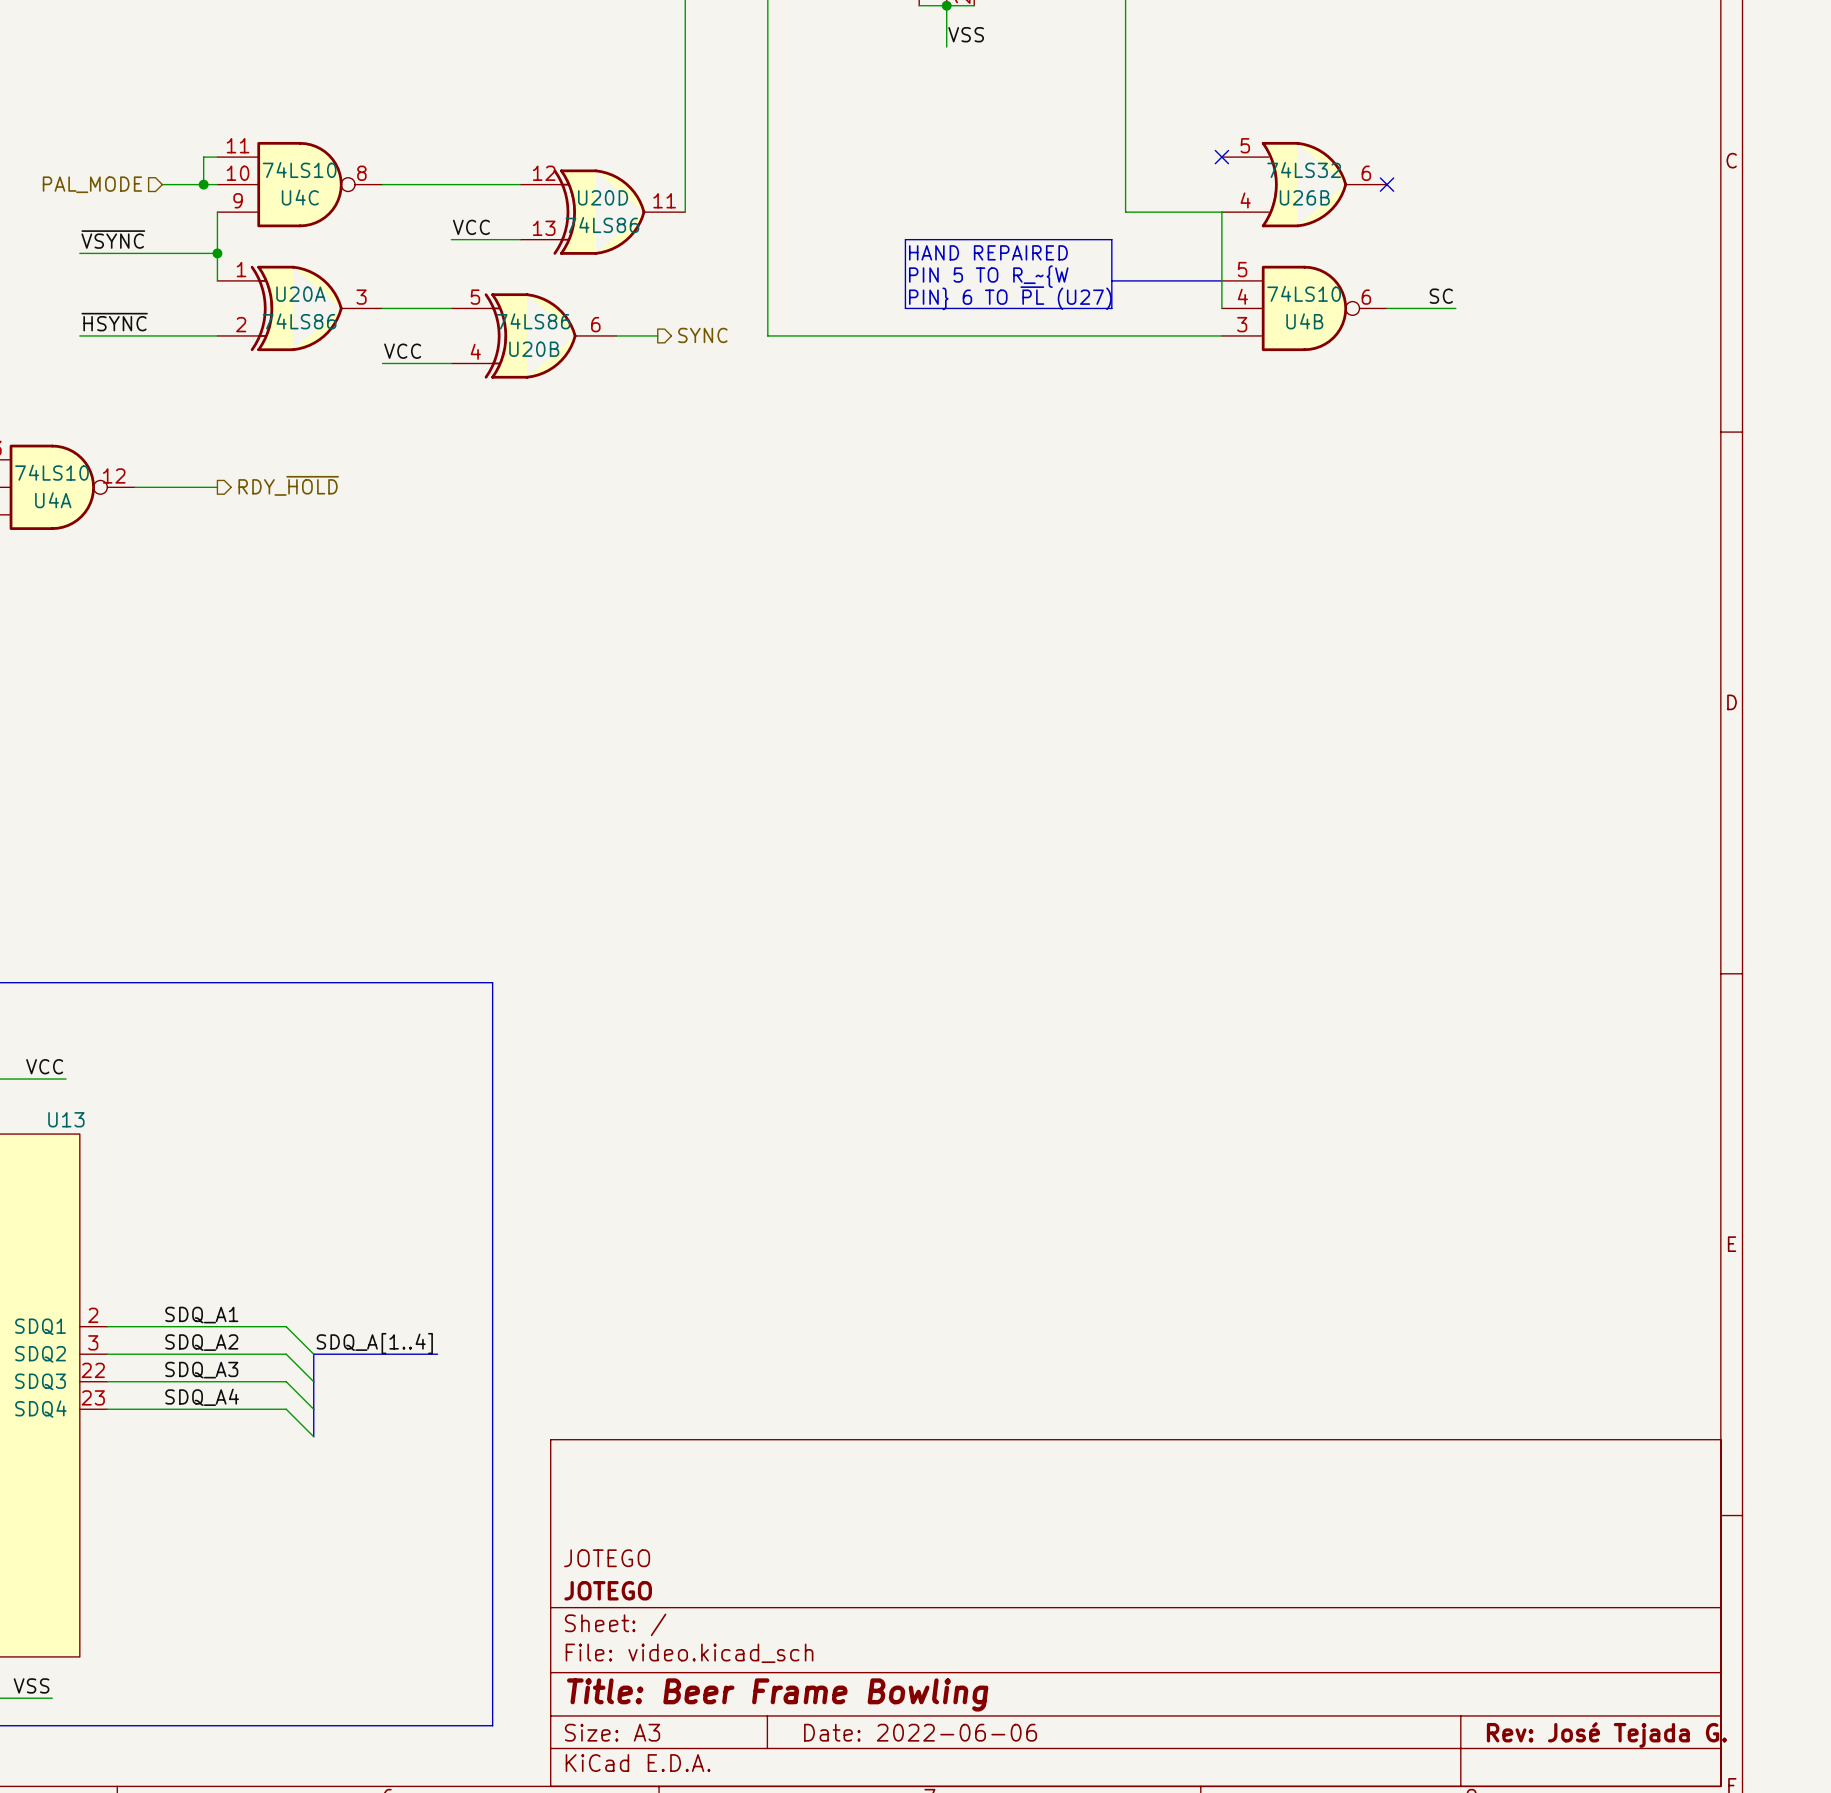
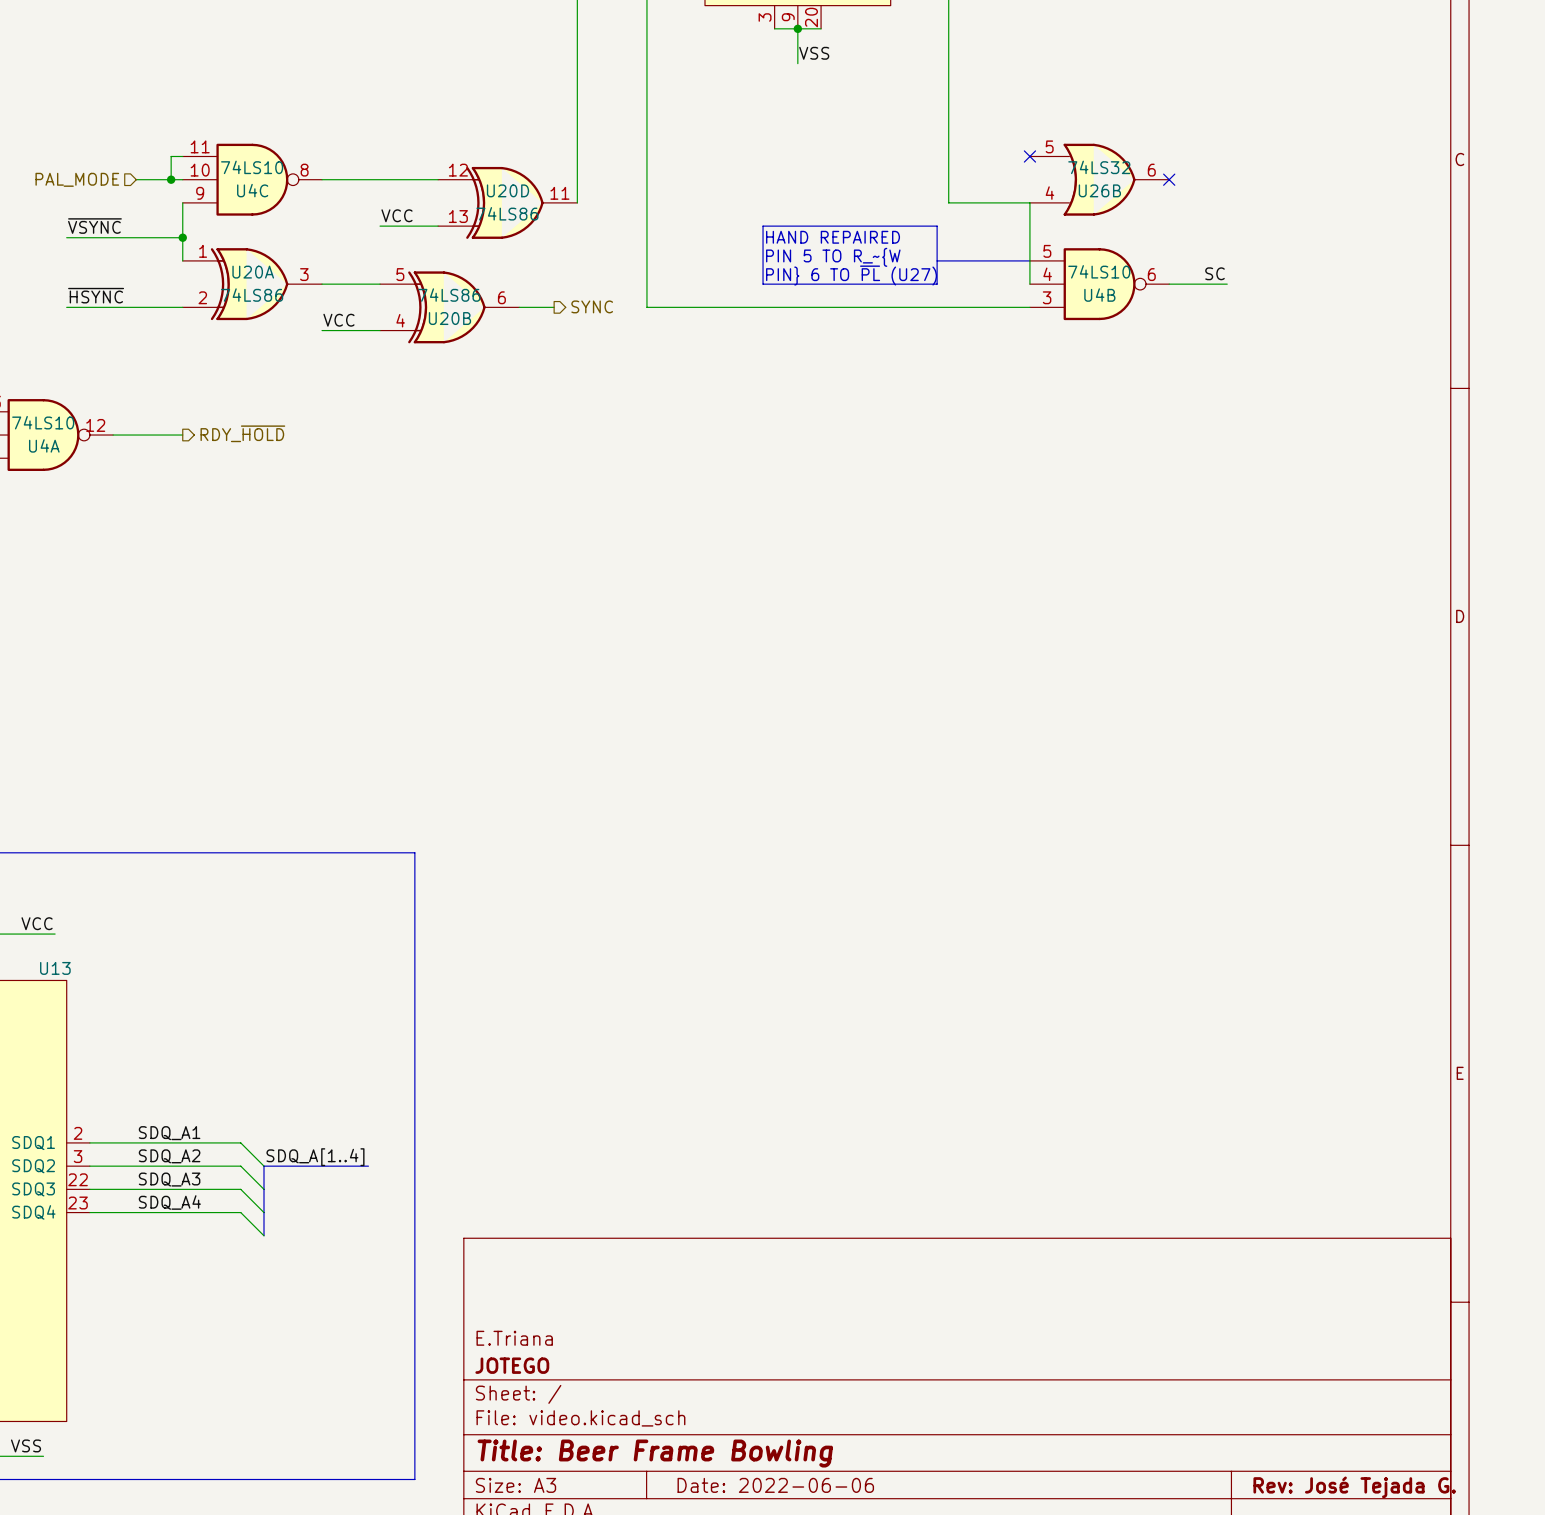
title block: JOTEGO (607, 1558) -> E.Triana (514, 1338)

